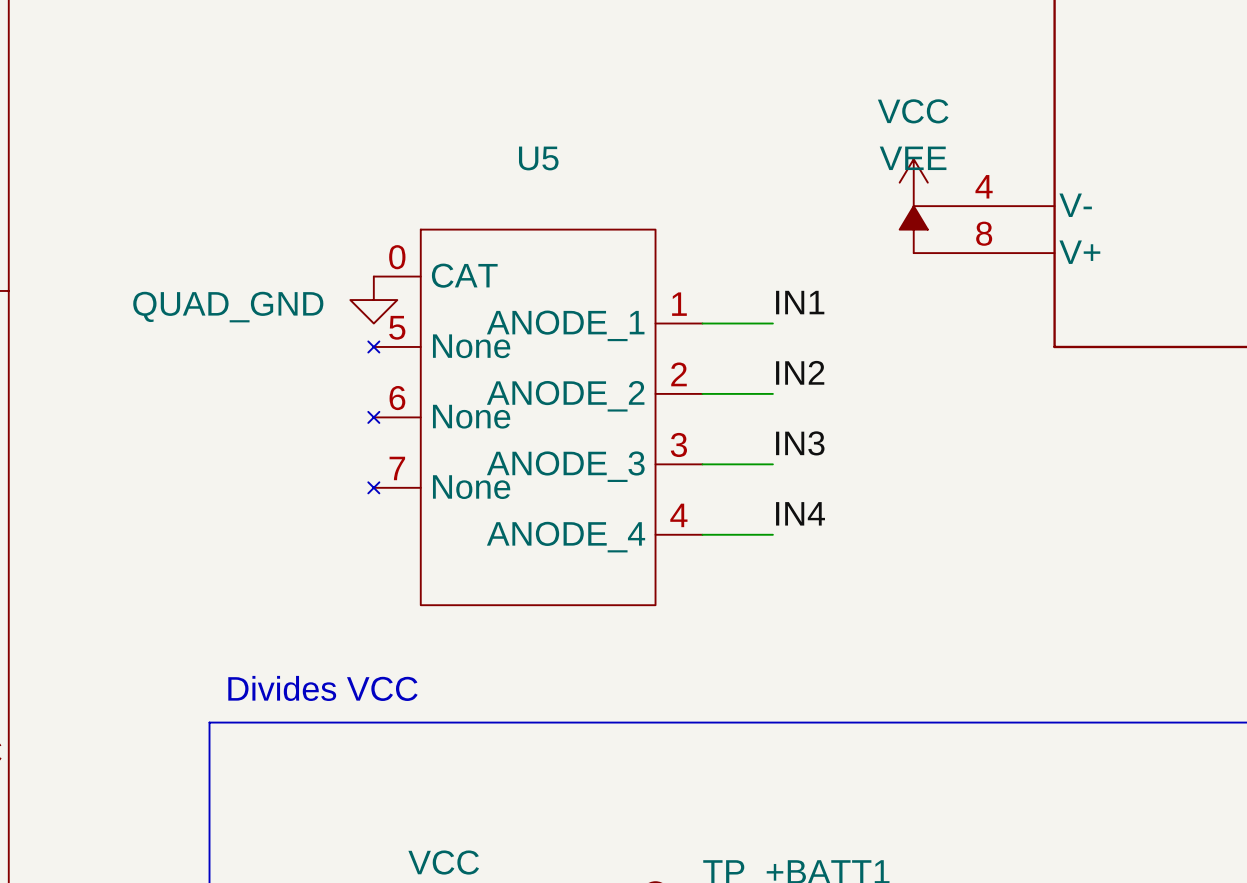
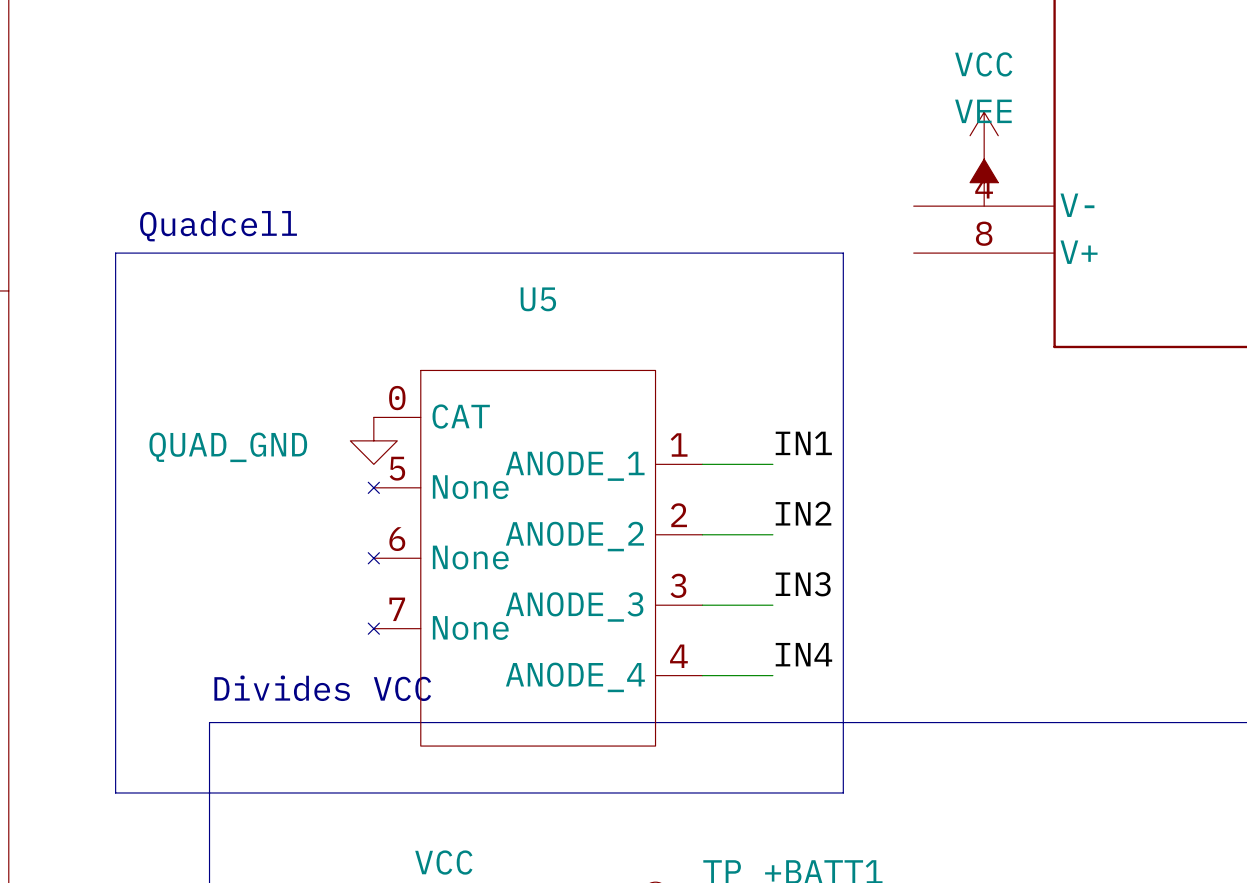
power symbol position: VCC (913, 182) -> VCC (984, 135)
text: none -> Quadcell (218, 226)
power symbol position: VEE (913, 229) -> VEE (984, 182)
line: none -> (115, 253) (843, 253) (843, 792) (115, 792) (115, 253)
power symbol position: QUAD_GND (373, 300) -> QUAD_GND (373, 440)
label: IN1 (800, 302) -> none
wire: (702, 323) (772, 323) -> (702, 675) (772, 675)
label: IN2 (800, 372) -> none
wire: (702, 393) (772, 393) -> (702, 605) (772, 605)
U5 position: (535, 417) -> (535, 558)
label: IN3 (800, 443) -> IN1 (803, 443)
label: IN4 (800, 513) -> IN2 (803, 513)
label: none -> IN3 (803, 584)
label: none -> IN4 (803, 654)

